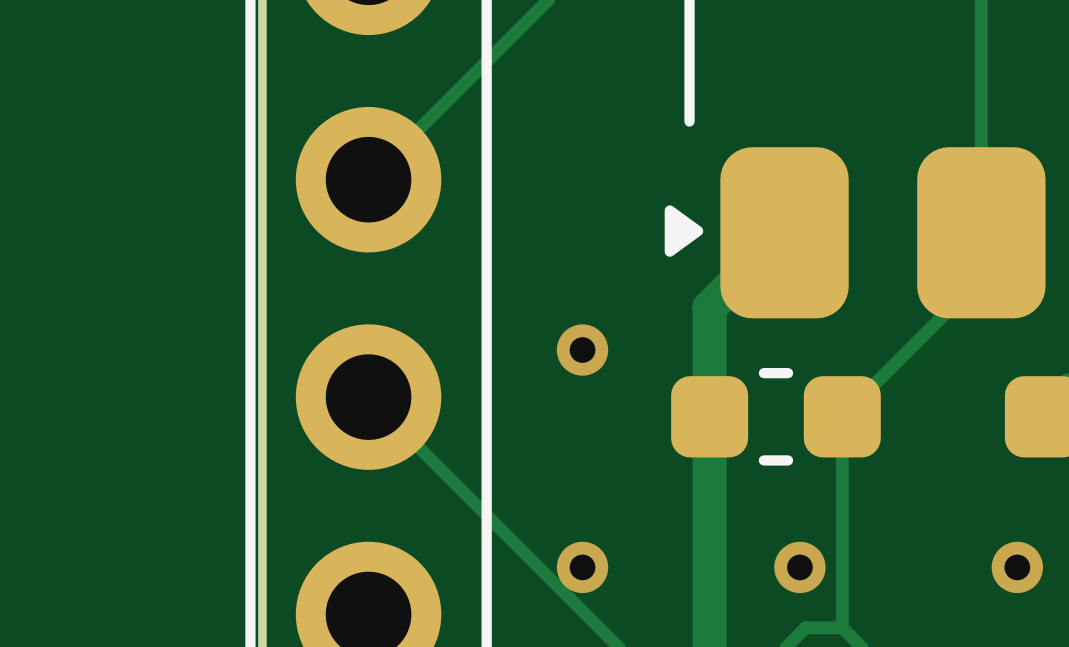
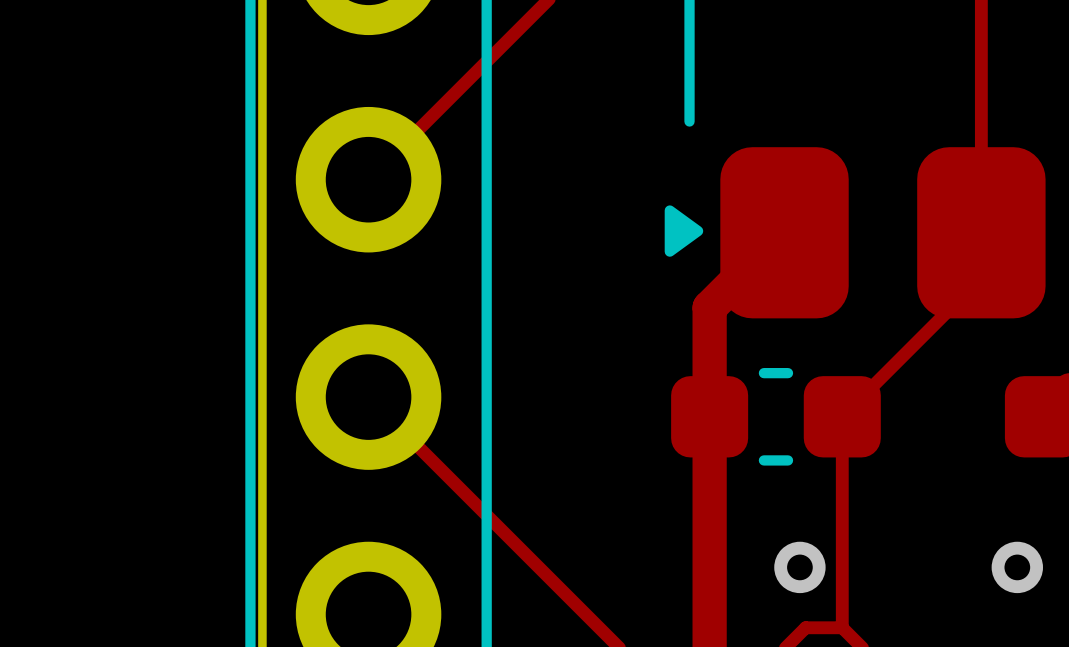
via: (582, 350) -> none
via: (582, 567) -> none

